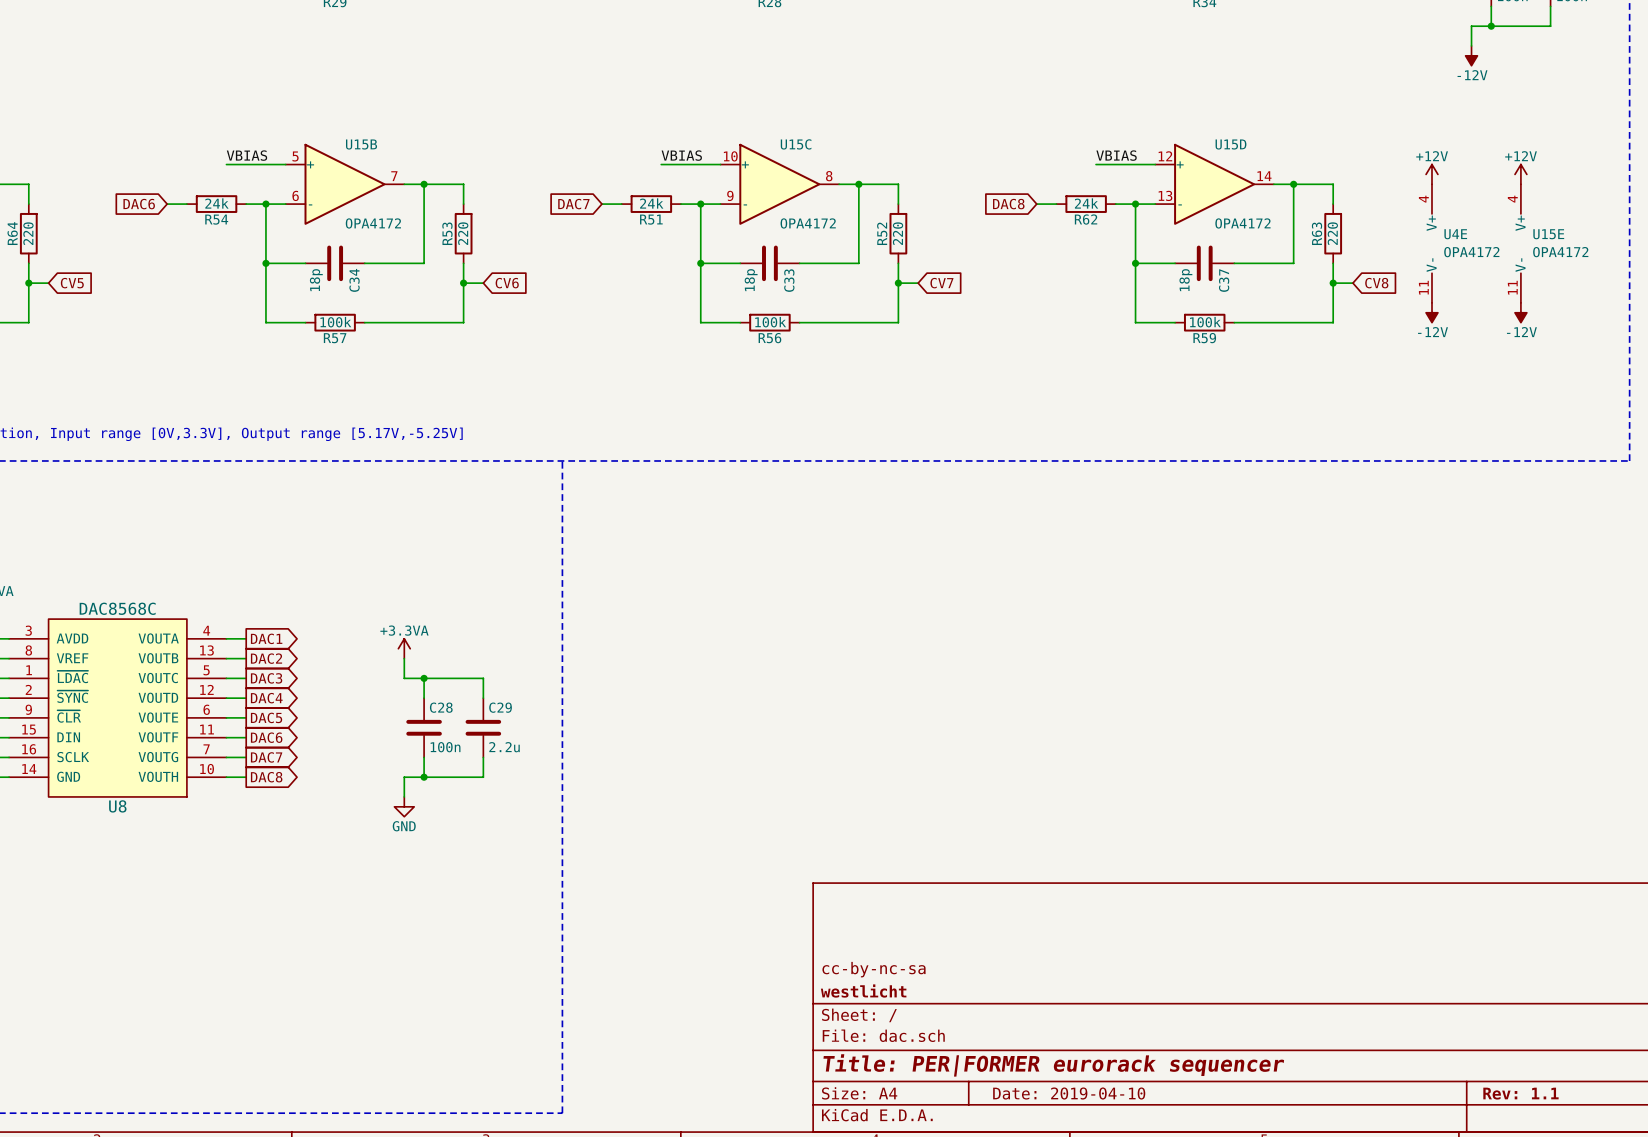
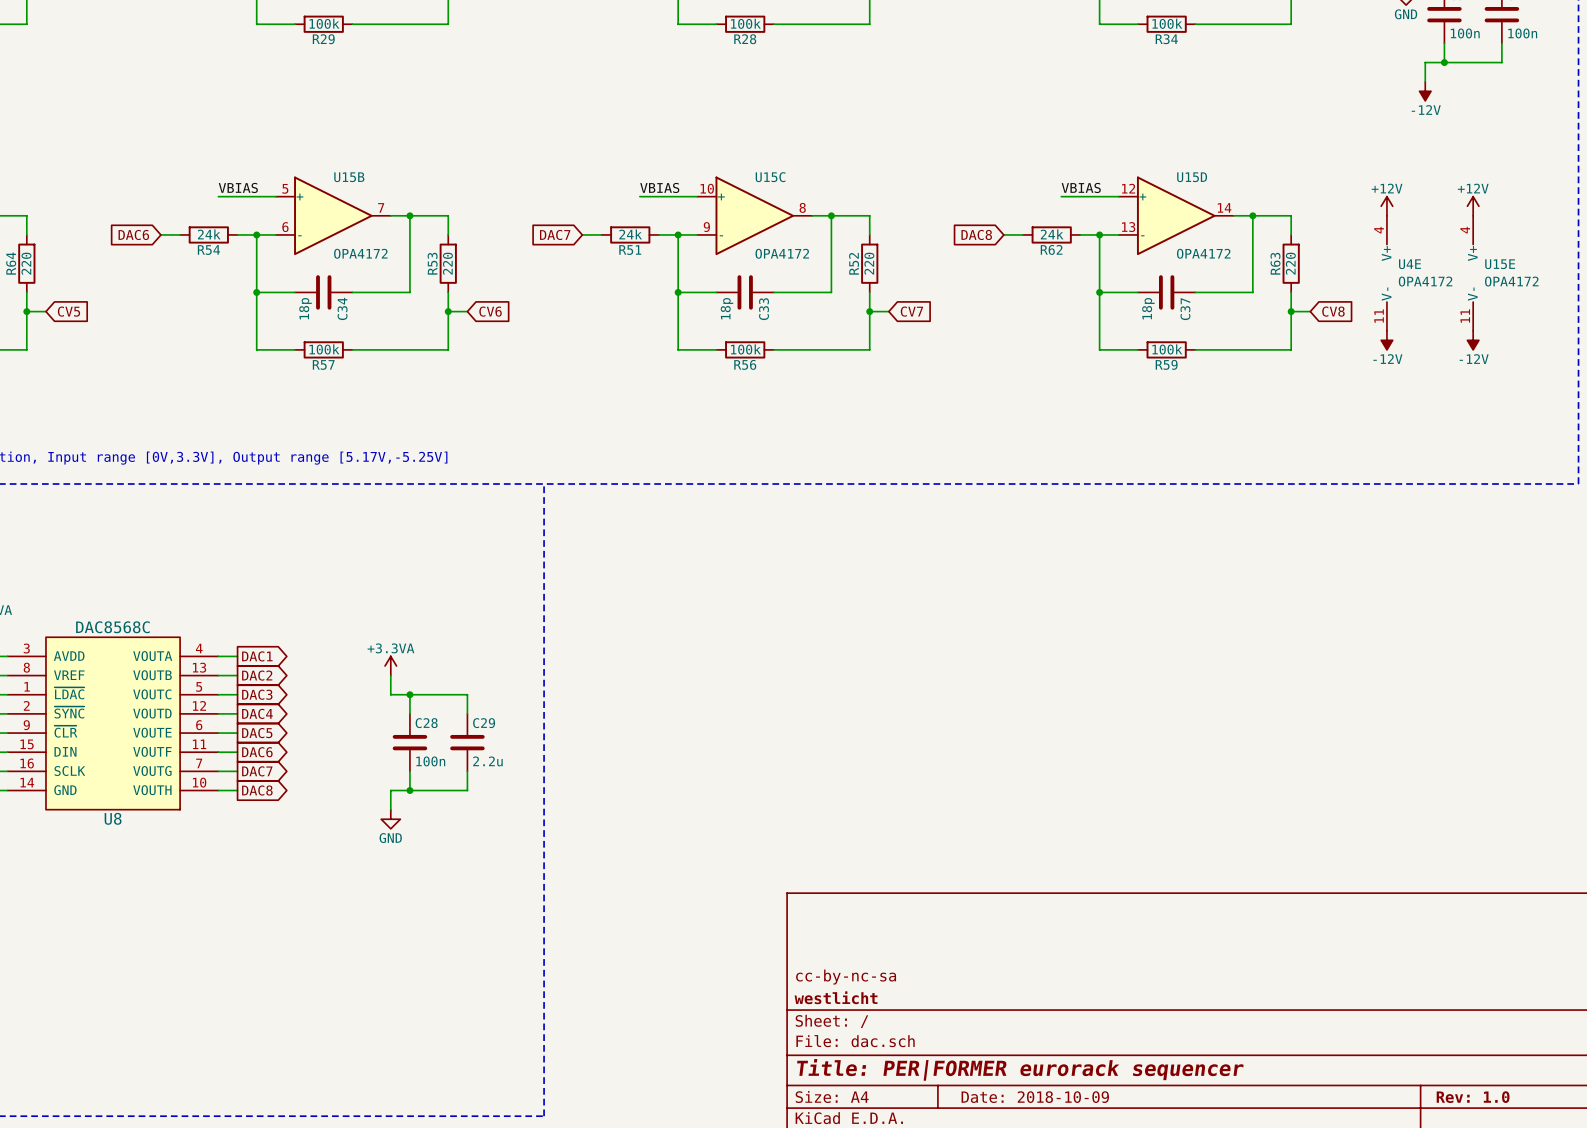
title block: Date: 2019-04-10 (1069, 1093) -> Date: 2018-10-09 (1035, 1097)
title block: Rev: 1.1 (1520, 1093) -> Rev: 1.0 (1473, 1097)

